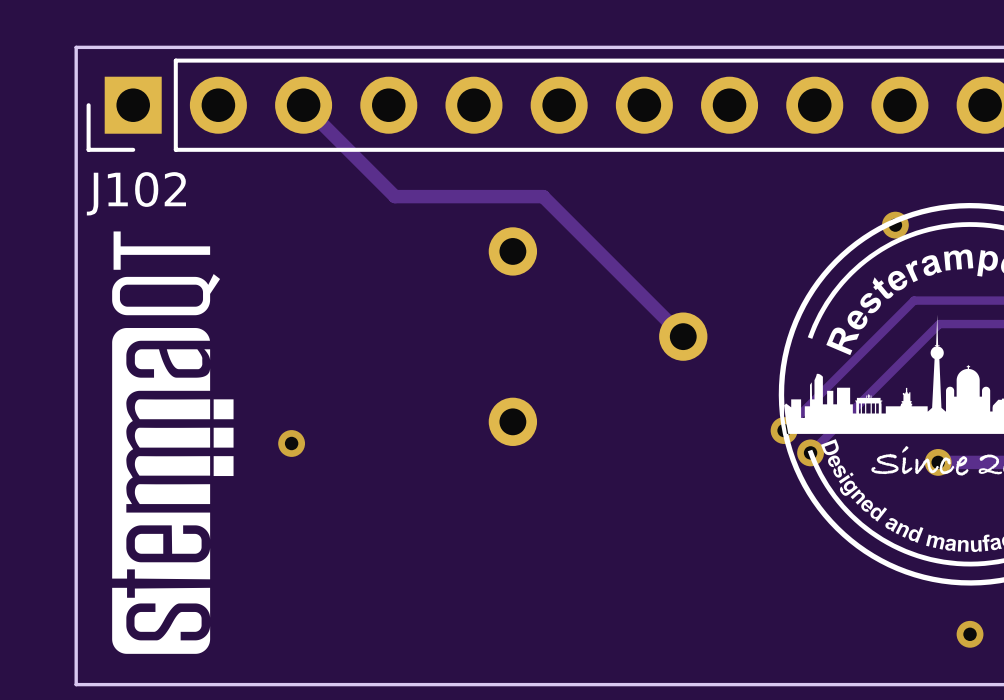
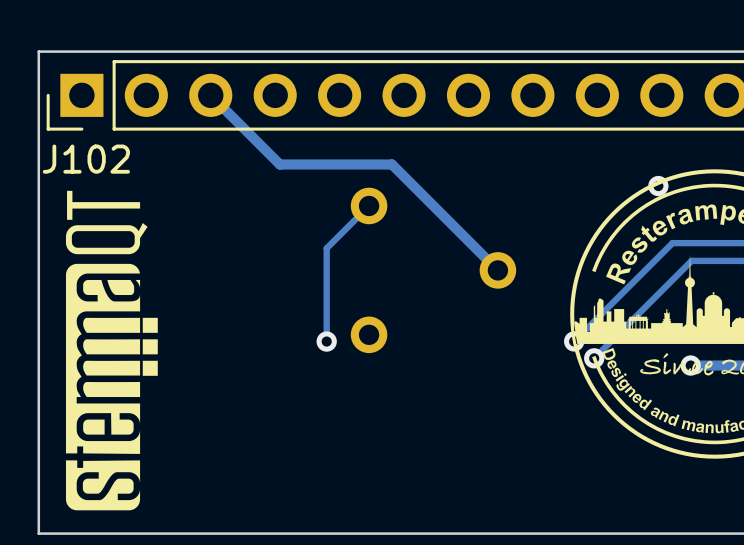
track: none -> (369, 205) (326, 248) (326, 341)
via position: (291, 443) -> (326, 341)
via: (970, 634) -> none

